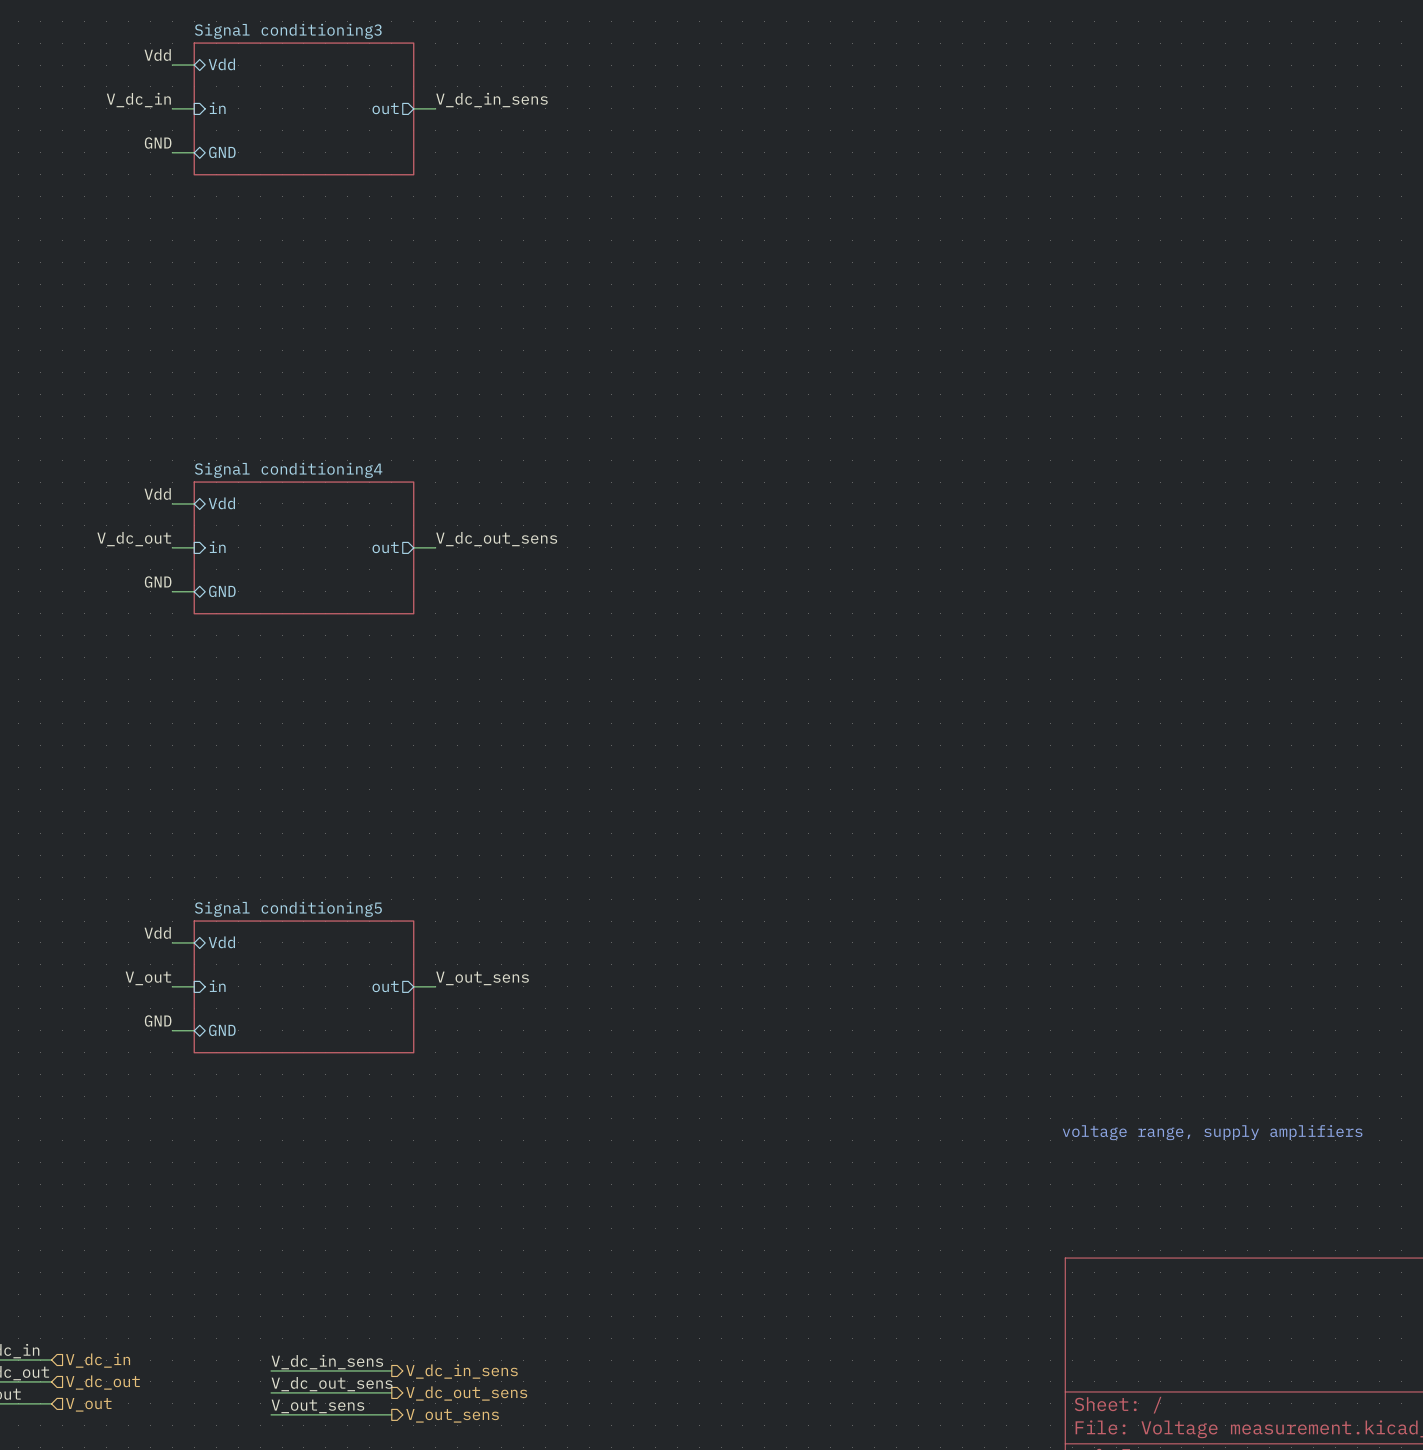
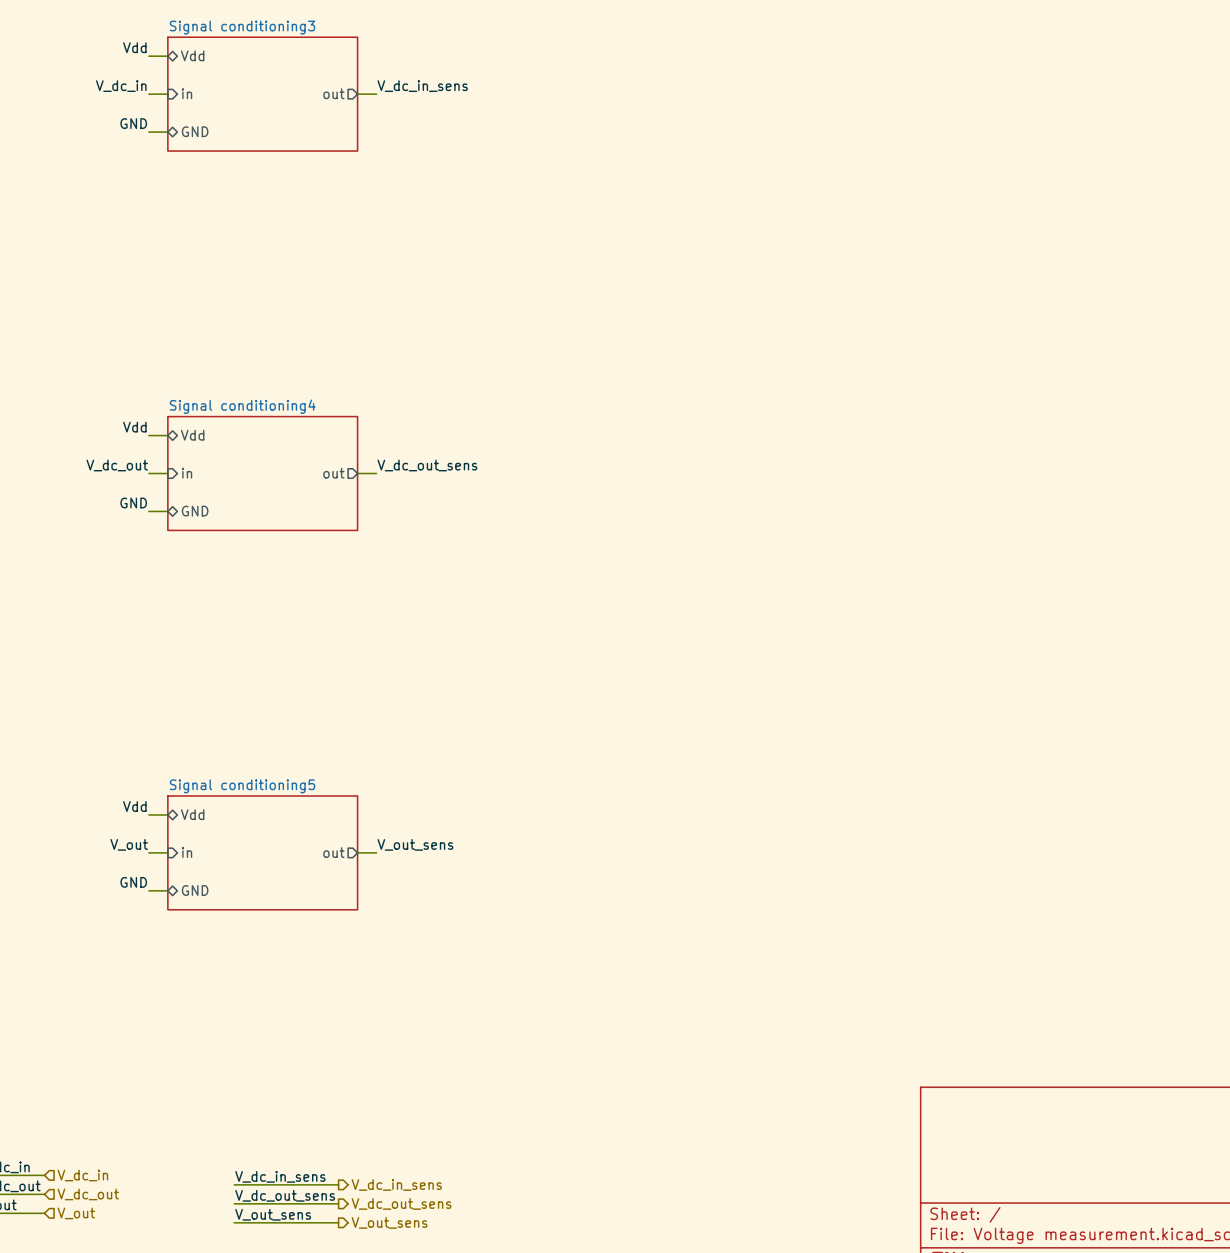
text: voltage range, supply amplifiers (1212, 1132) -> none

